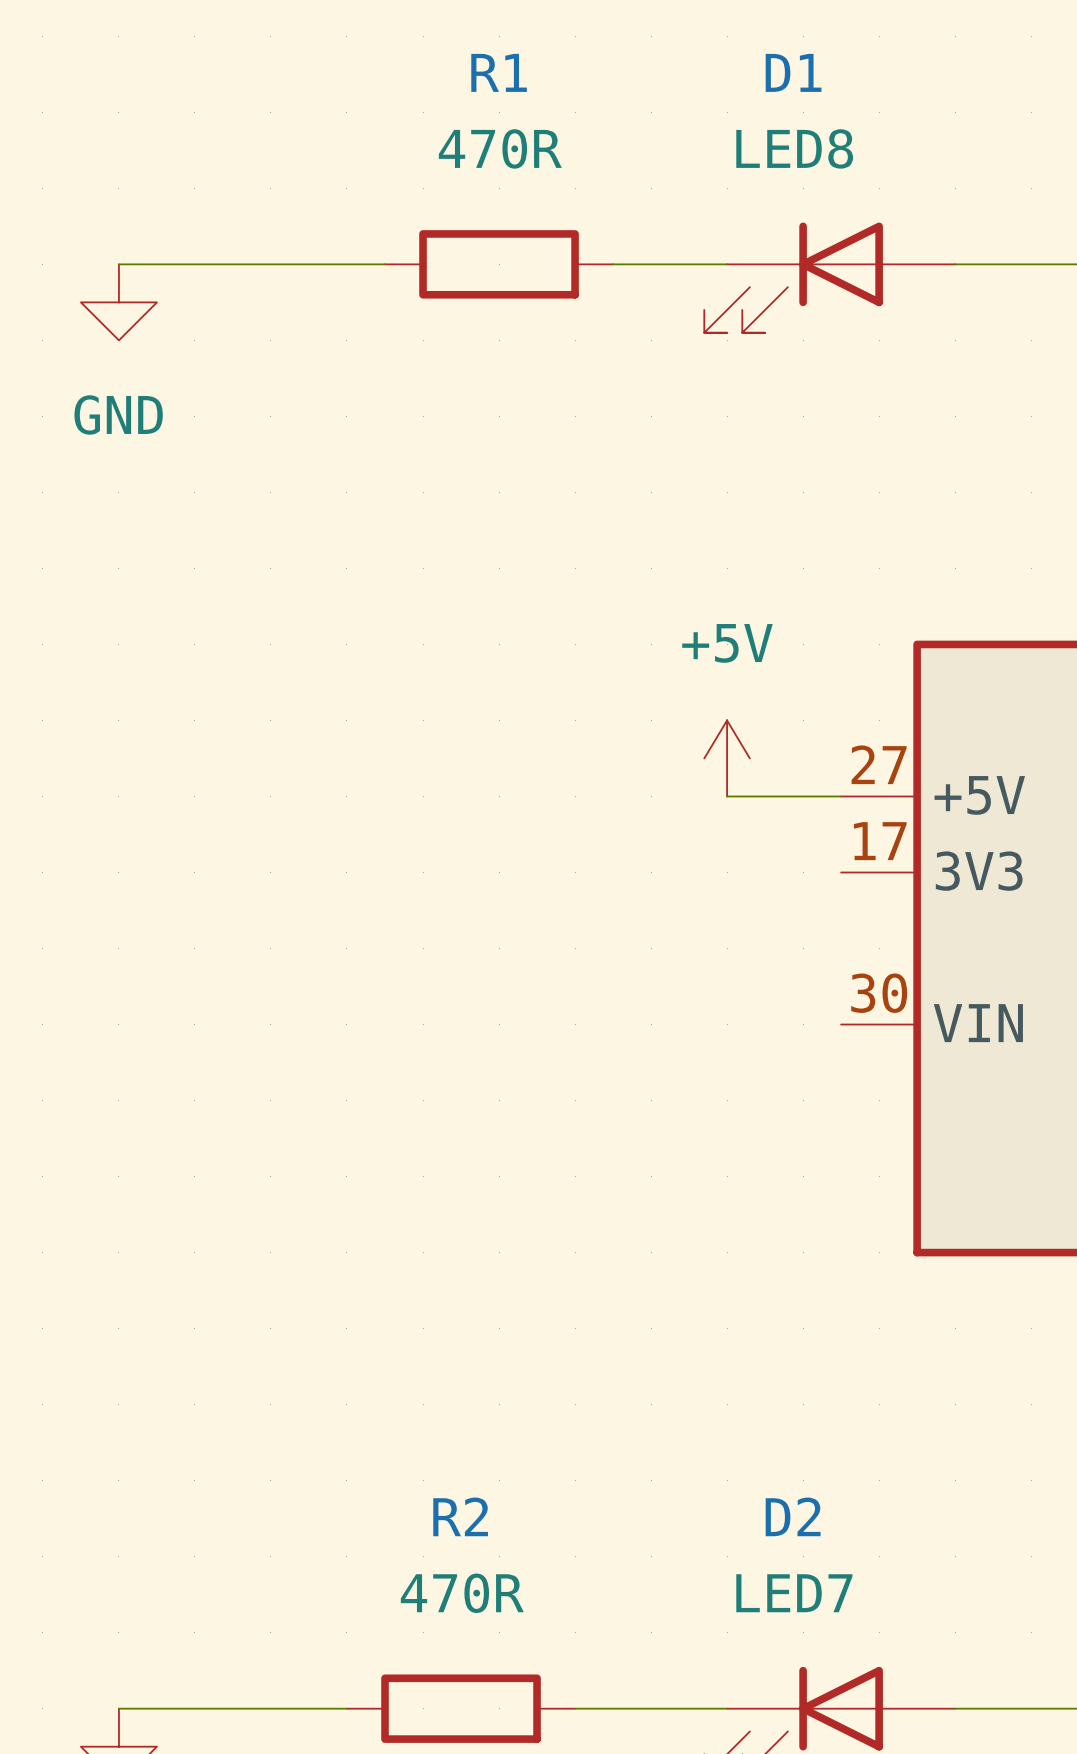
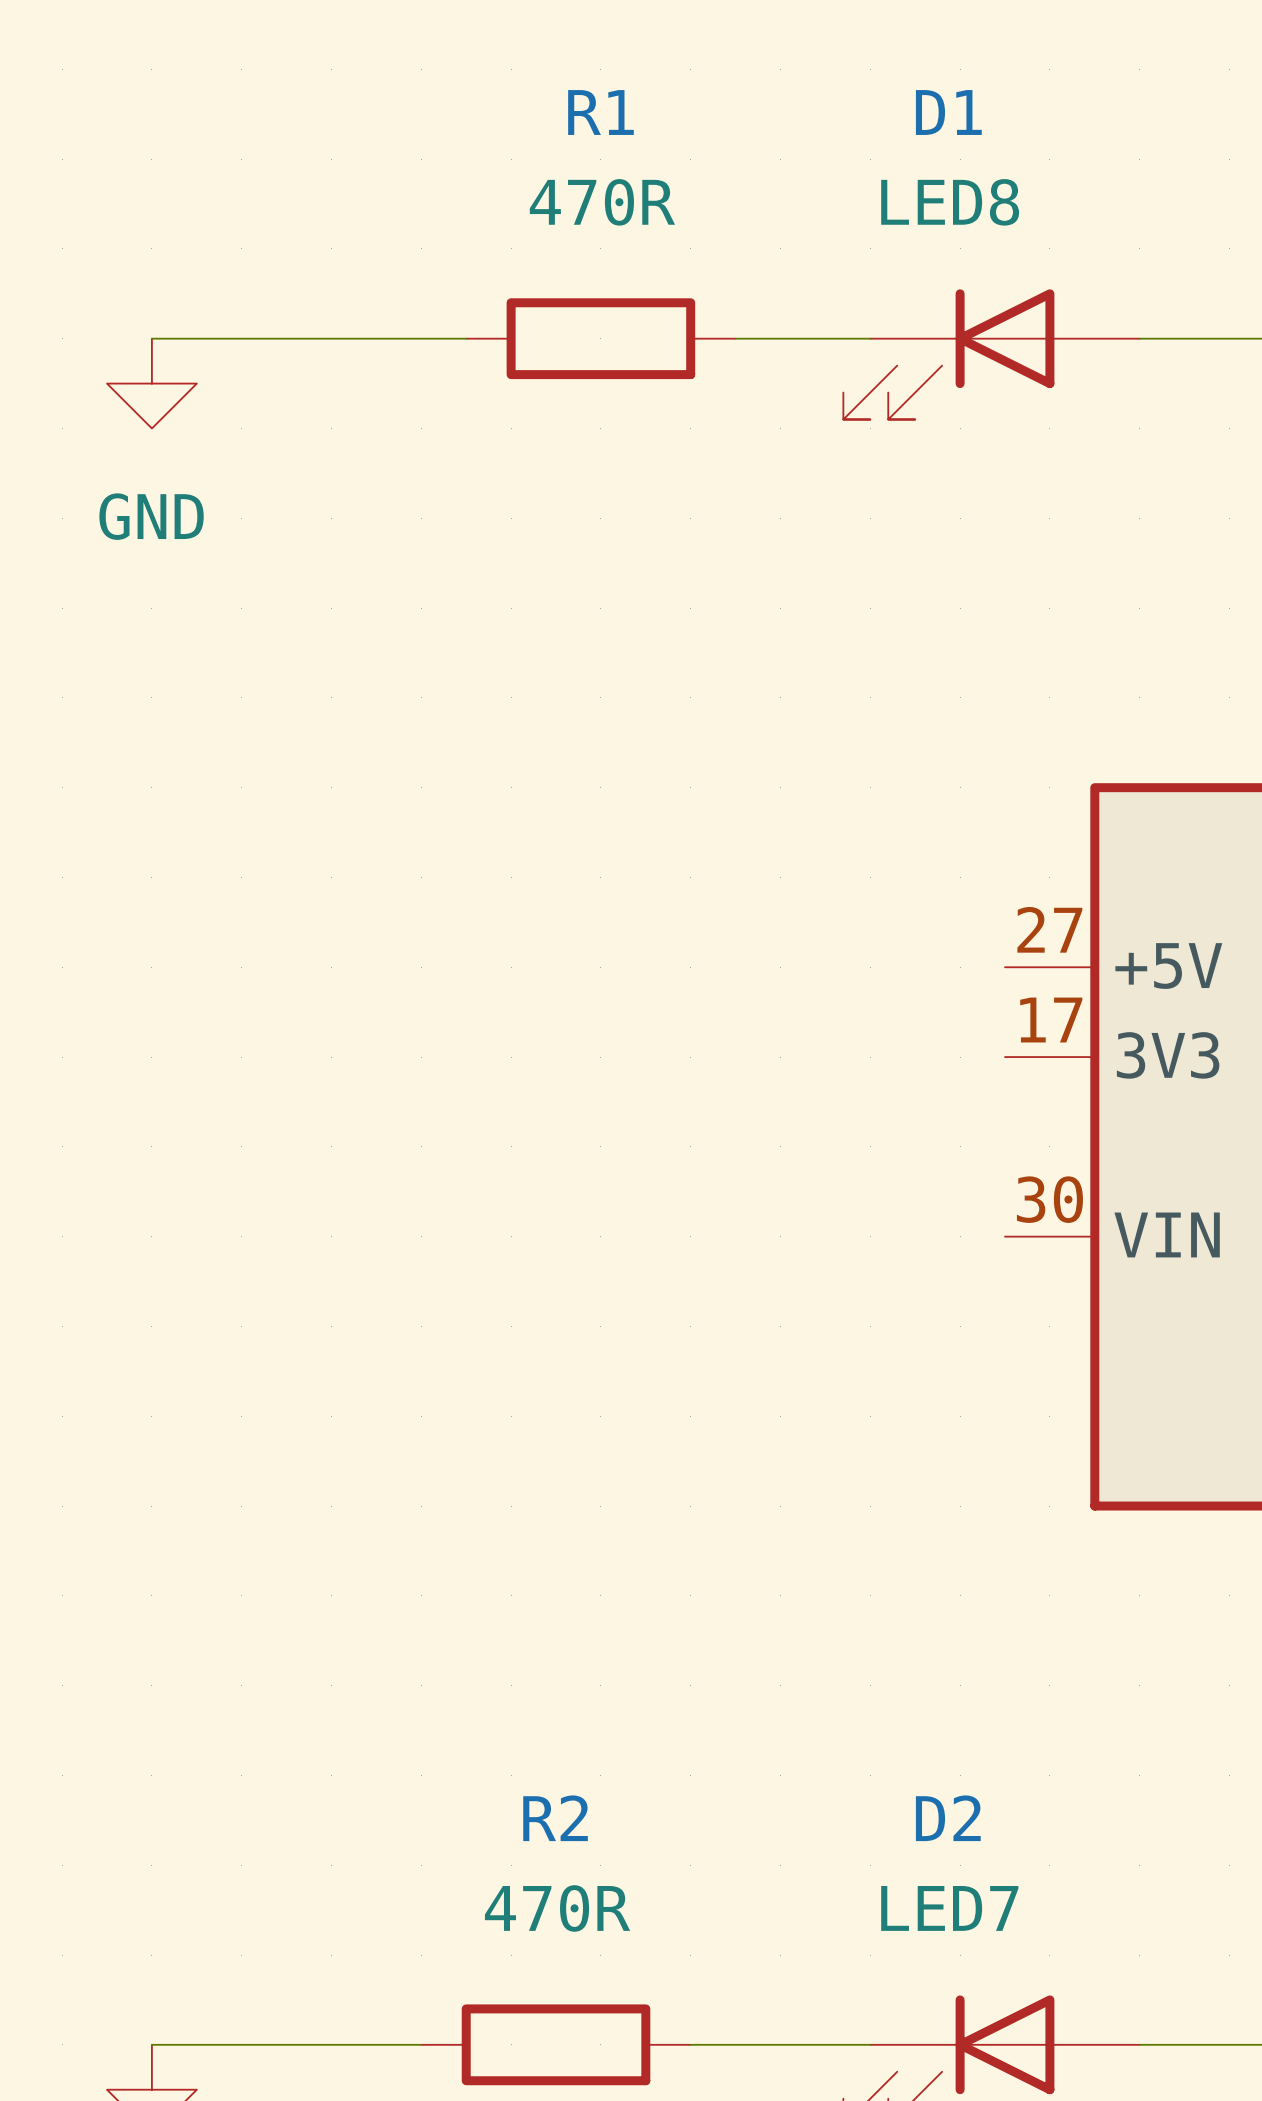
power symbol: +5V (727, 758) -> none
wire: (727, 796) (841, 796) -> none

